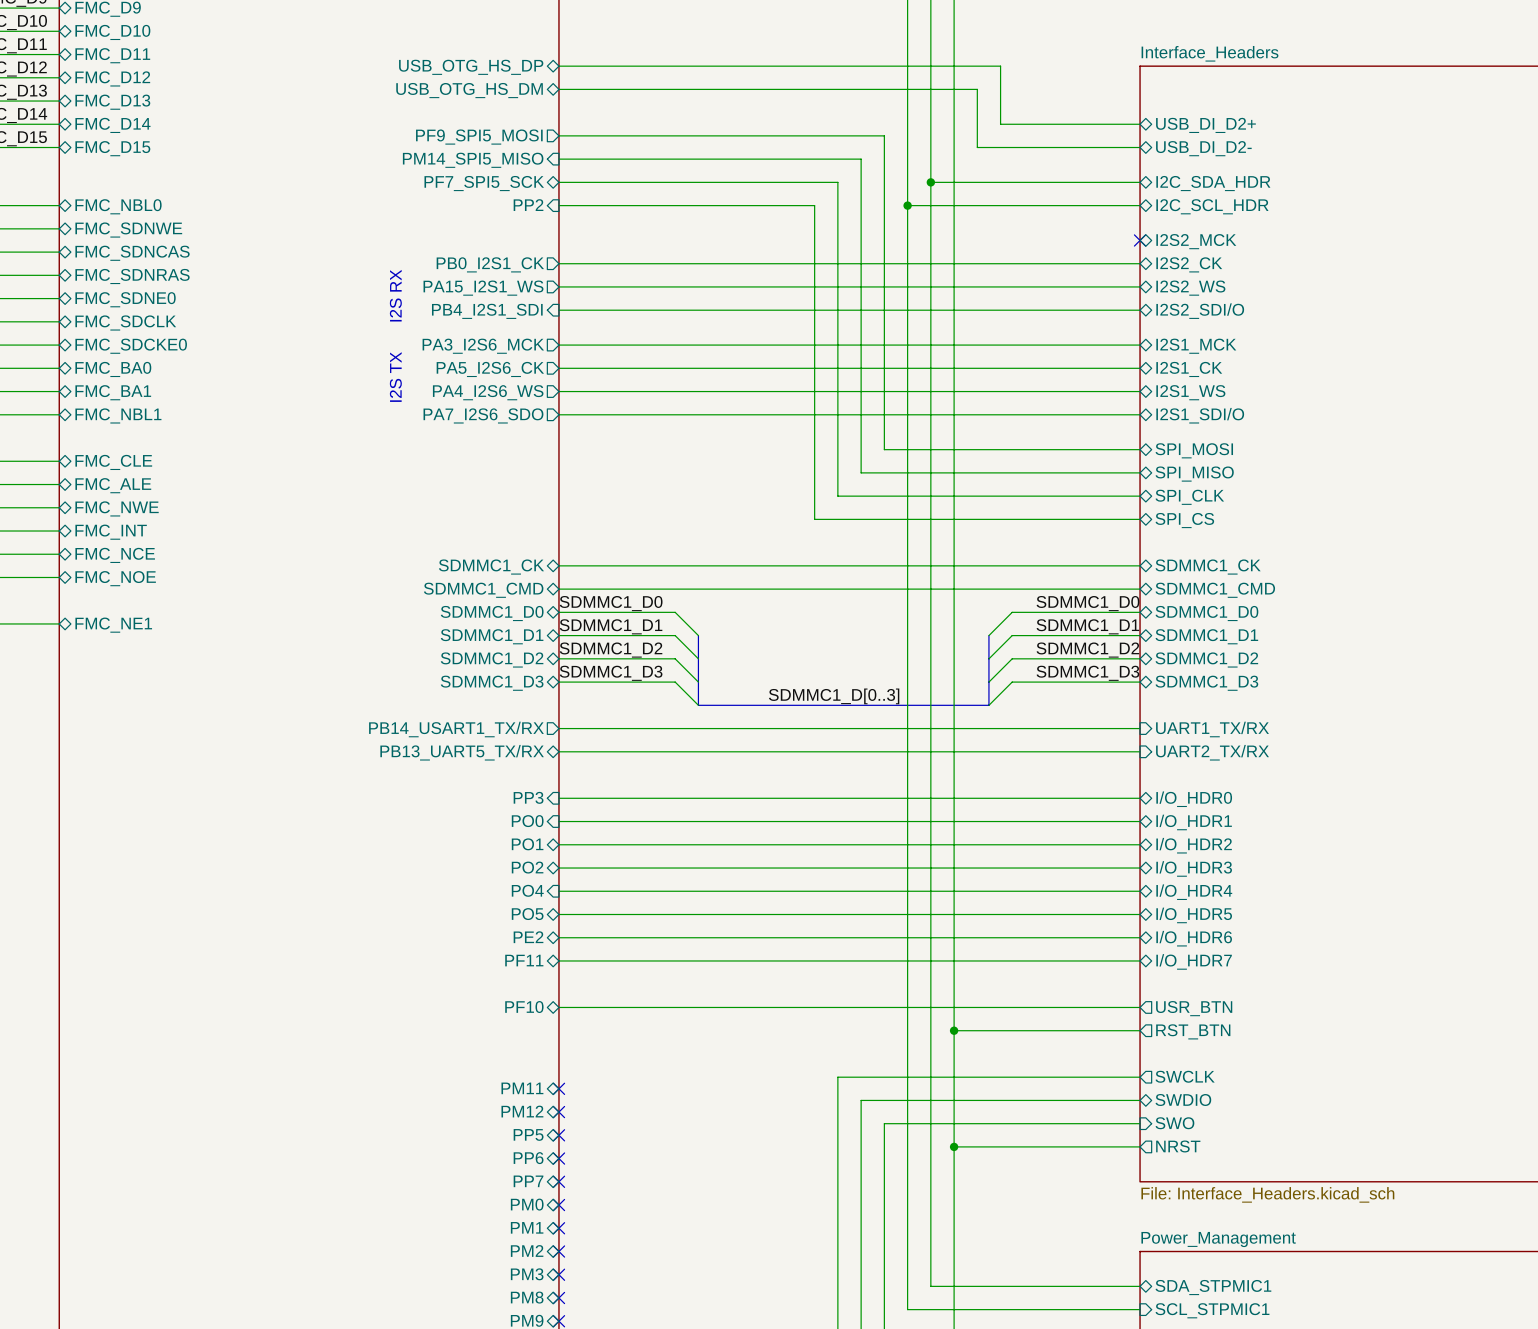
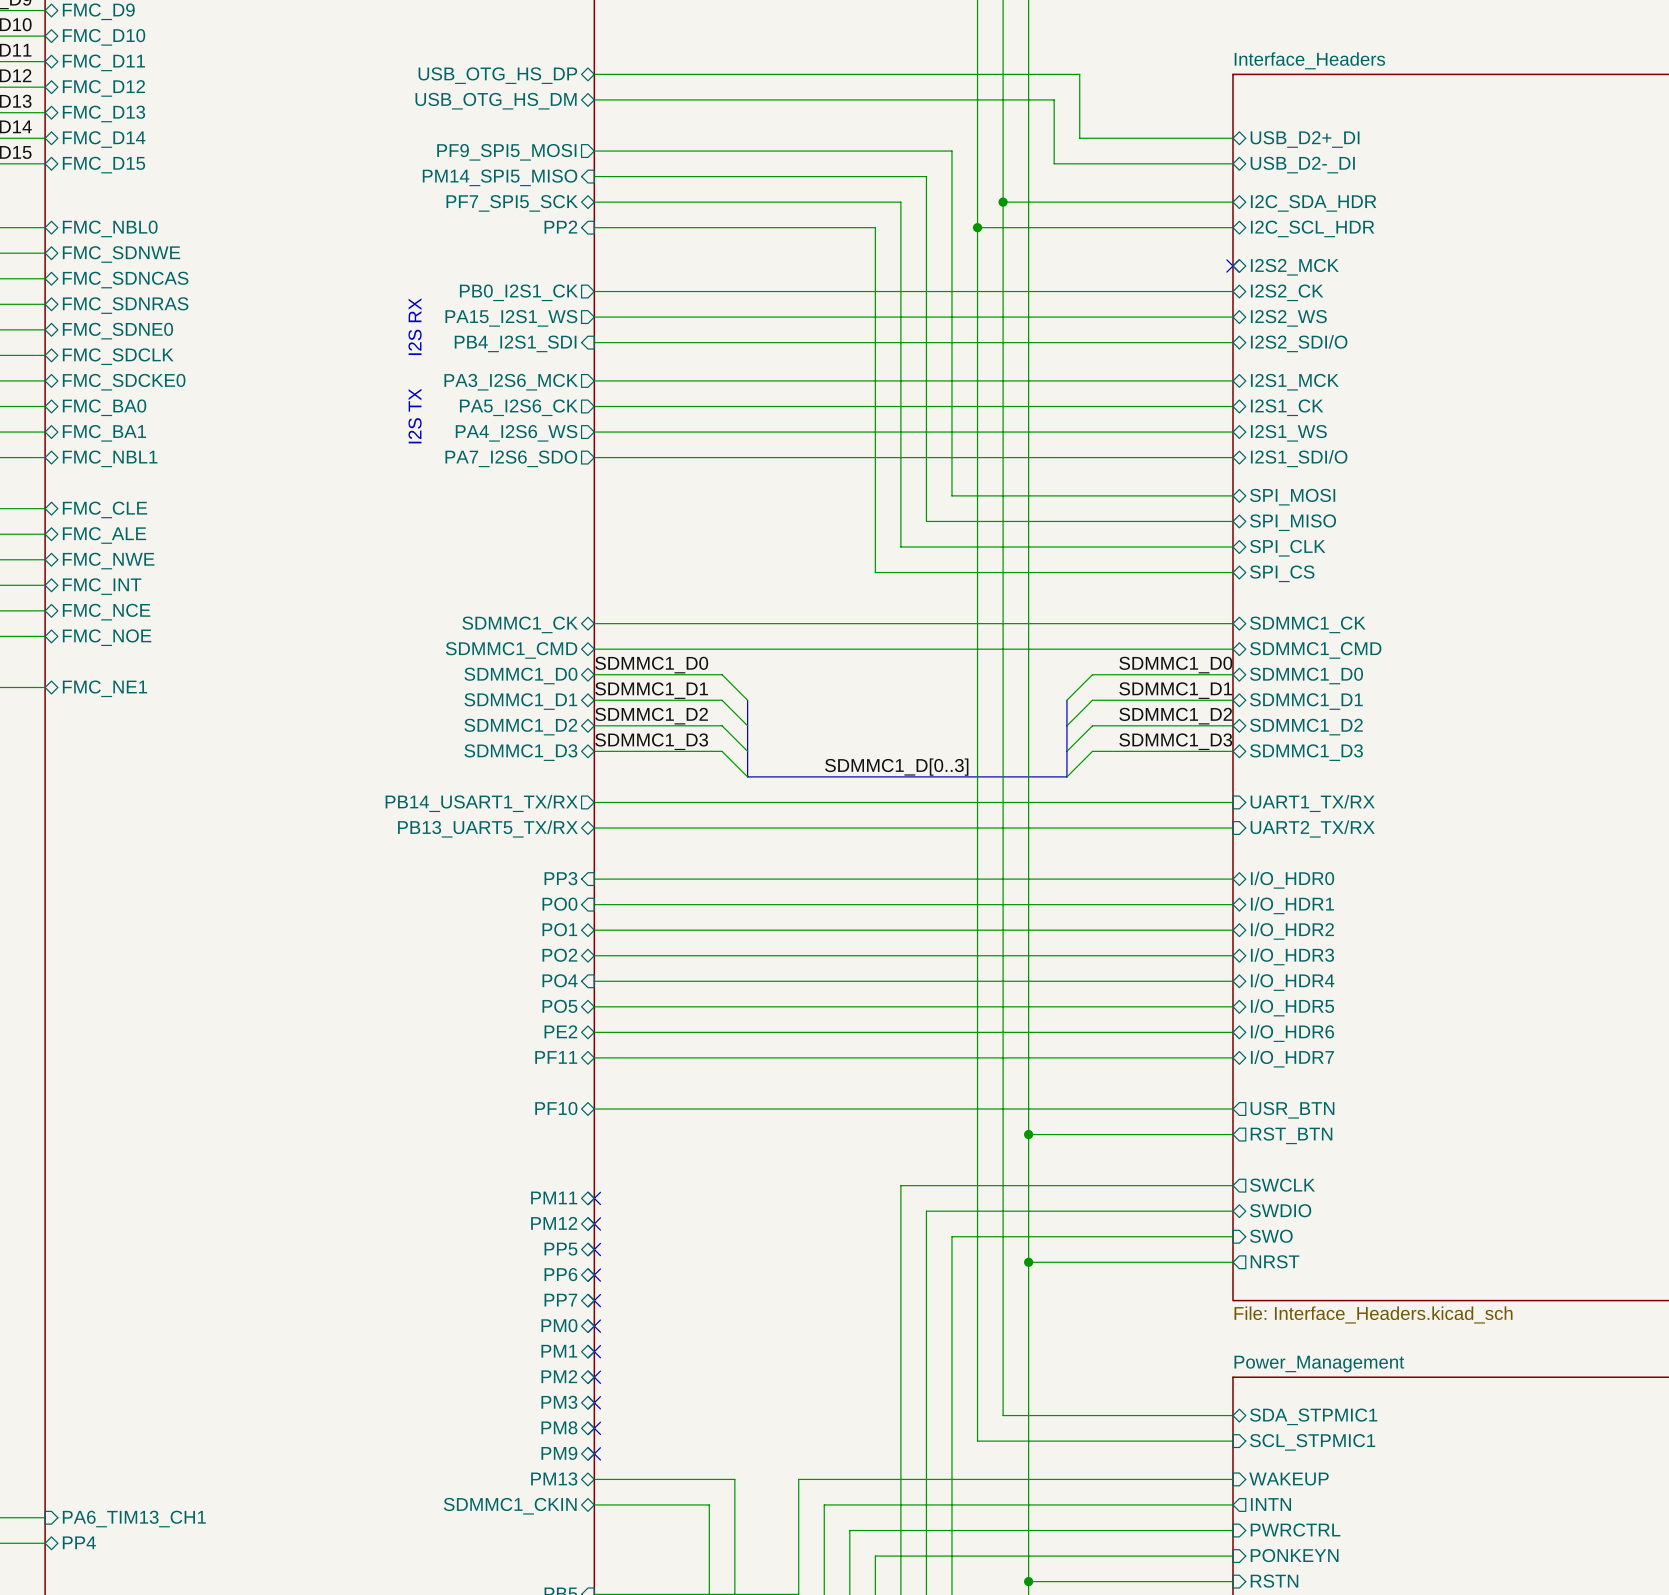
sheet pin: USB_DI_D2+ (1205, 125) -> USB_D2+_DI (1305, 139)
sheet pin: USB_DI_D2- (1203, 148) -> USB_D2-_DI (1302, 165)

